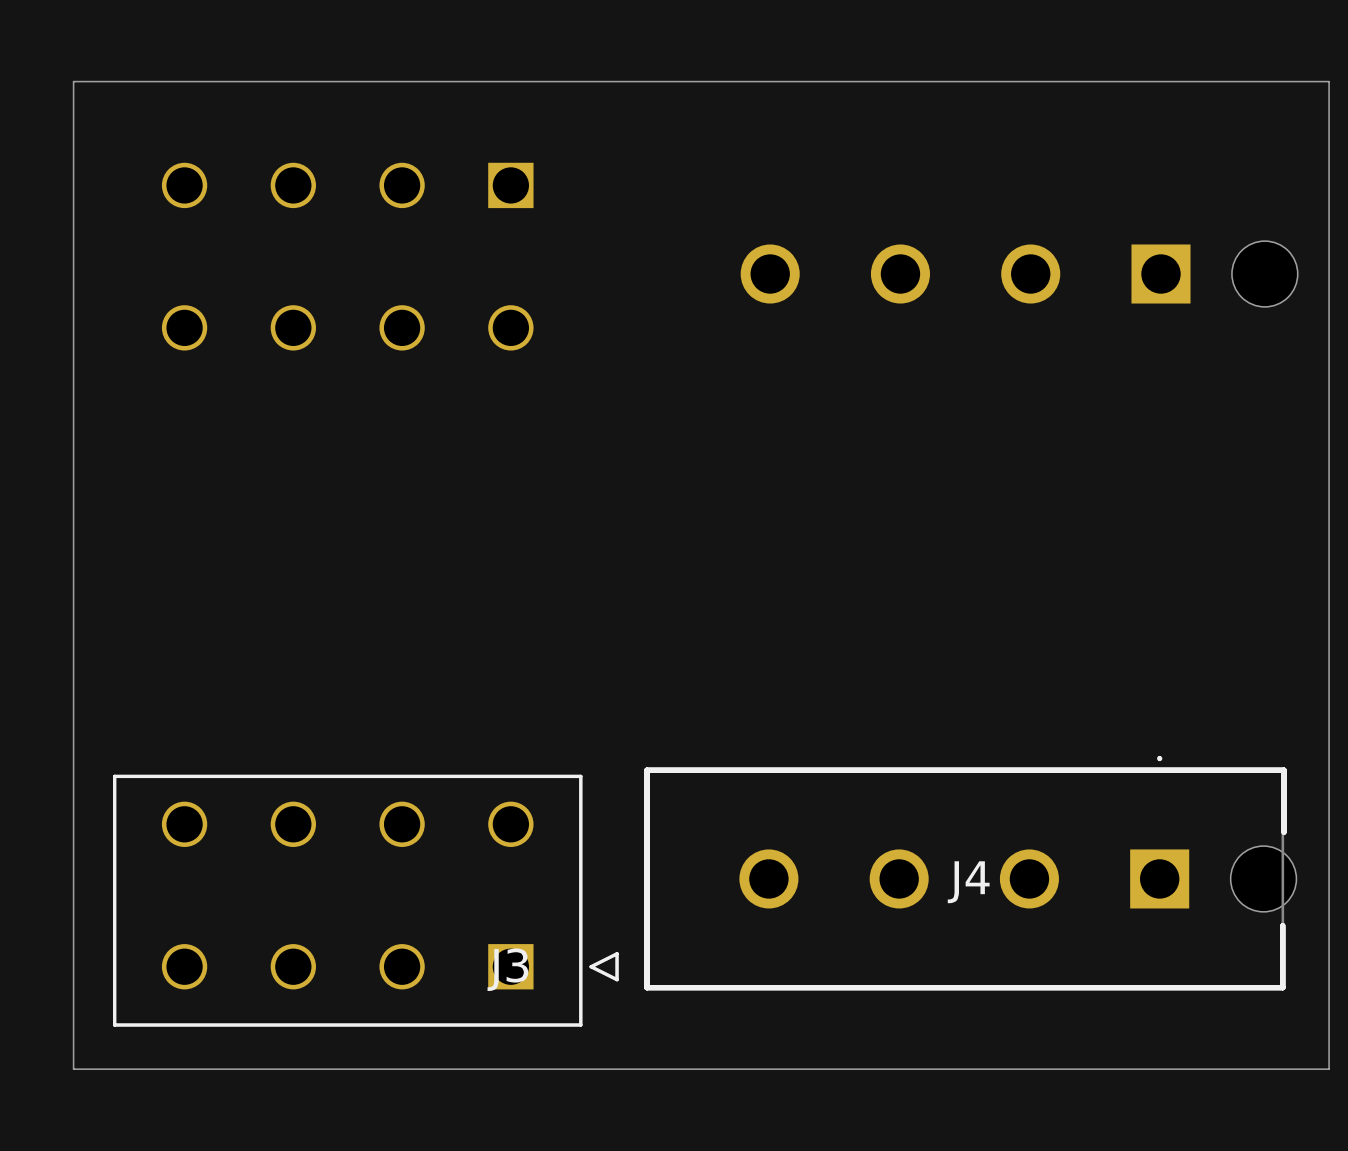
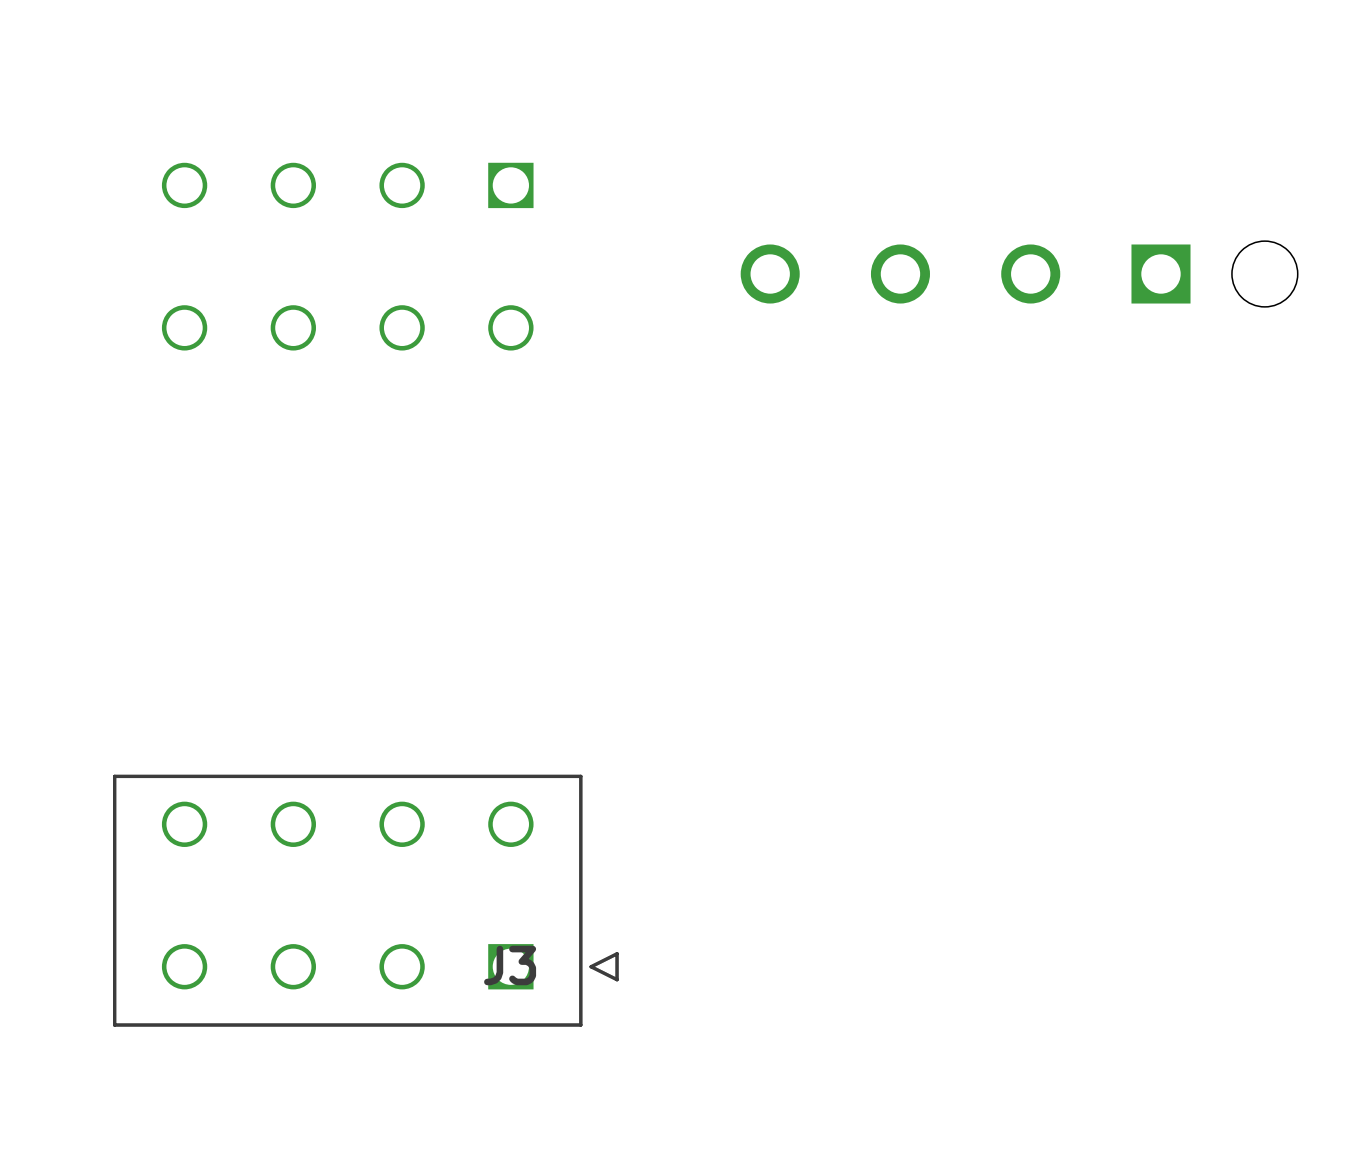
board edge: (1329, 81) (73, 81) (73, 1069) (1329, 1069) (1329, 81) -> none
J4: (970, 873) -> none

